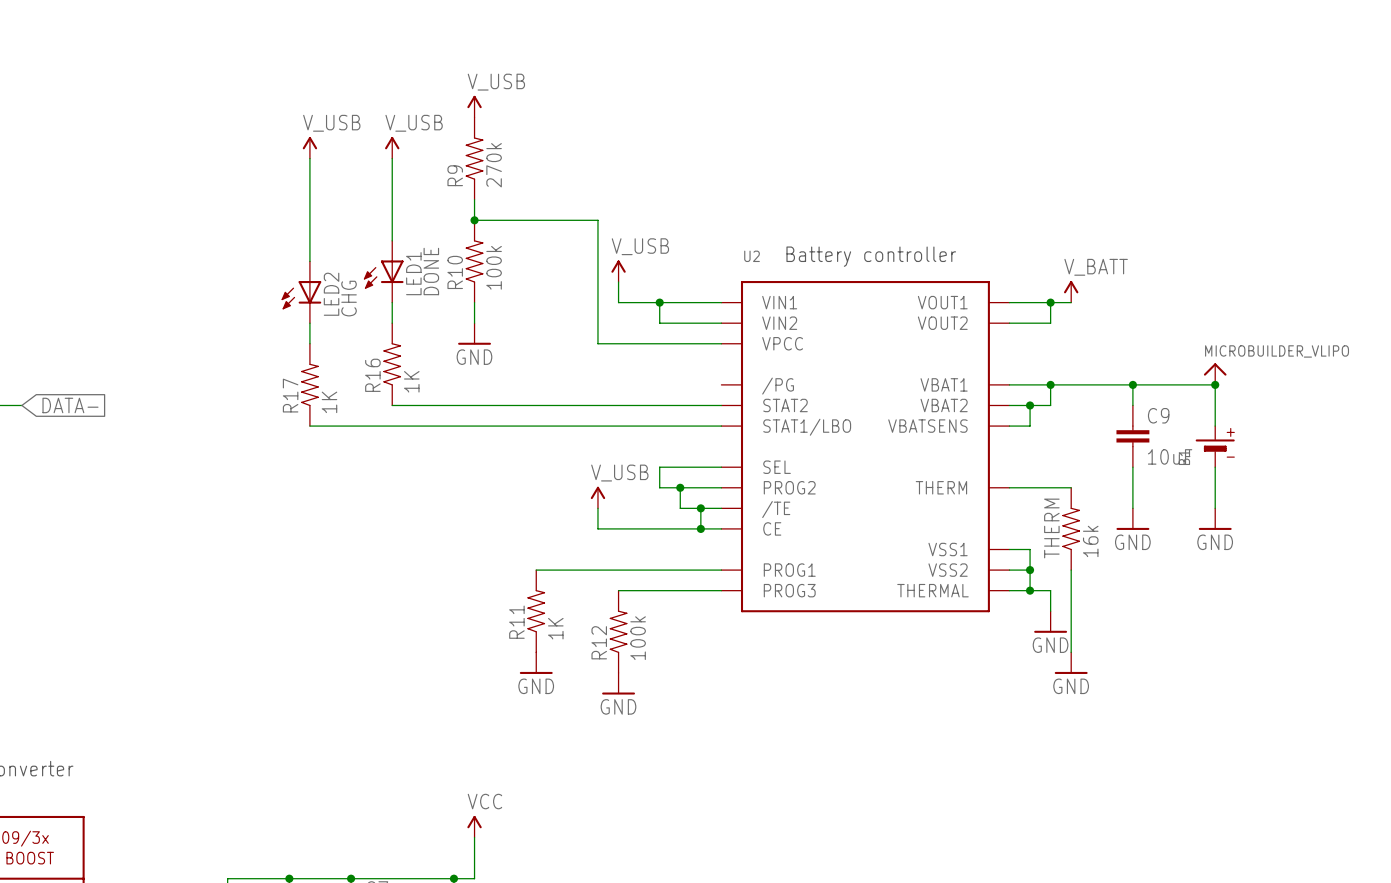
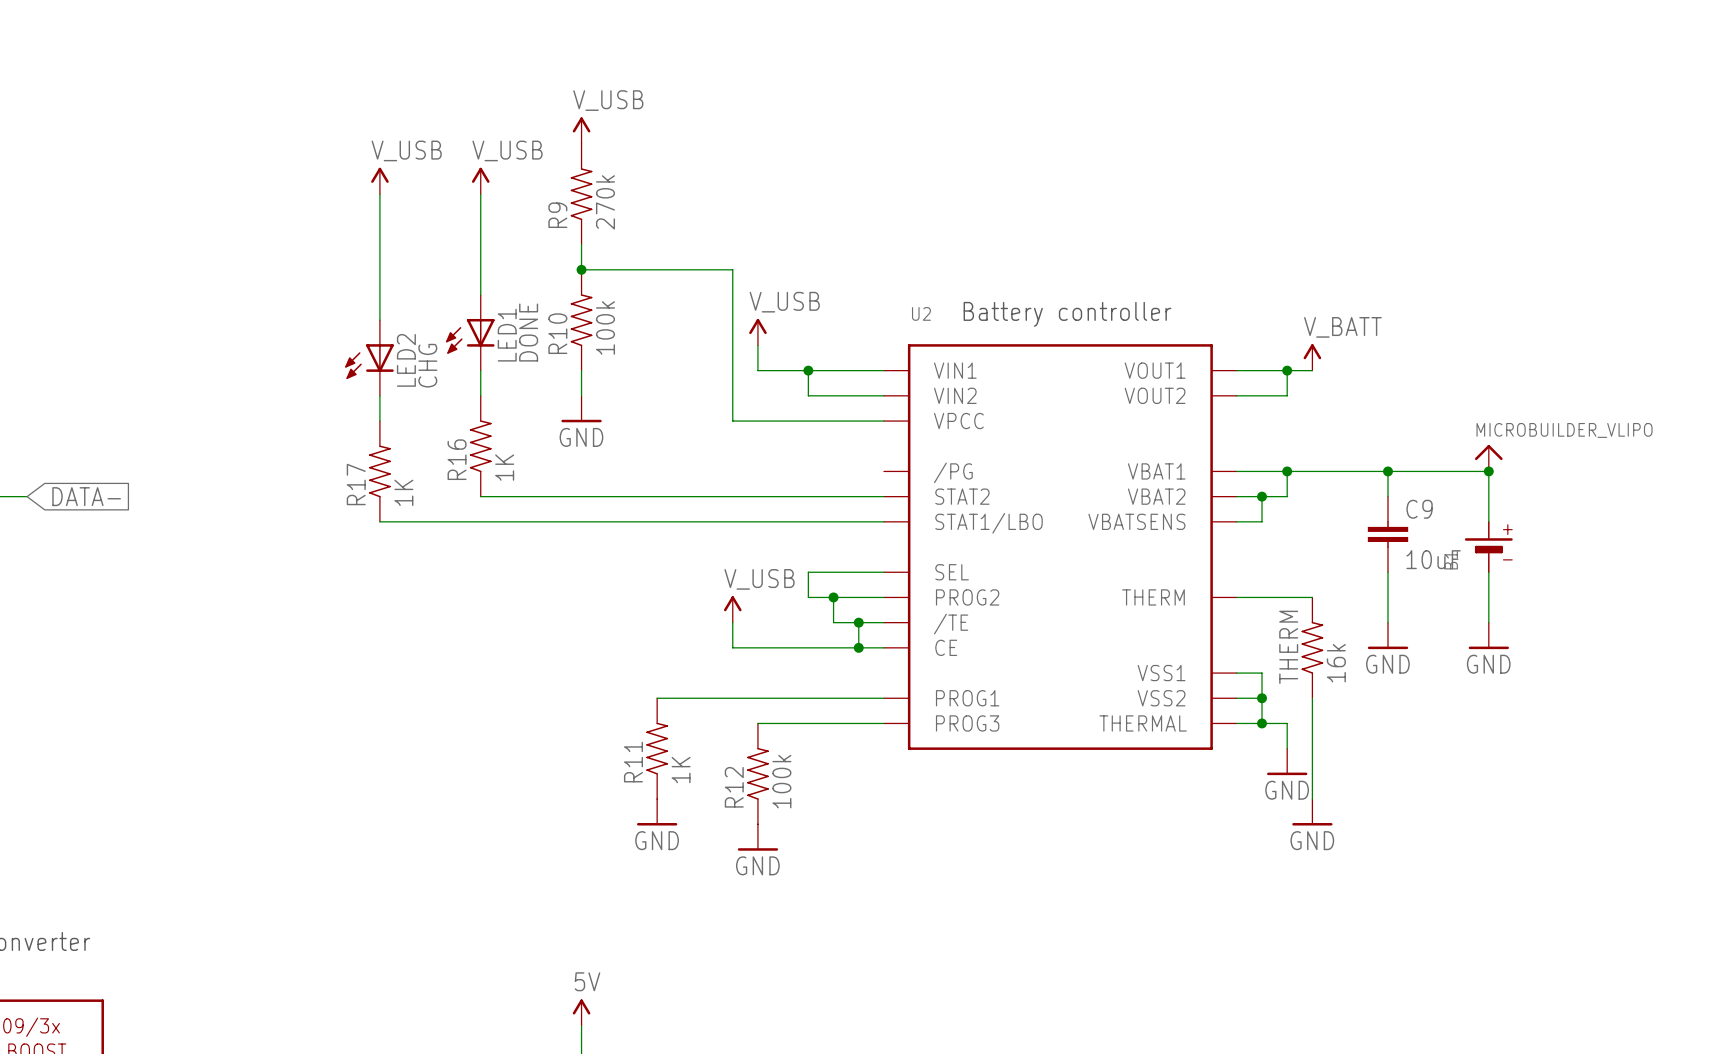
power symbol: VCC (474, 826) -> 5V (581, 1012)

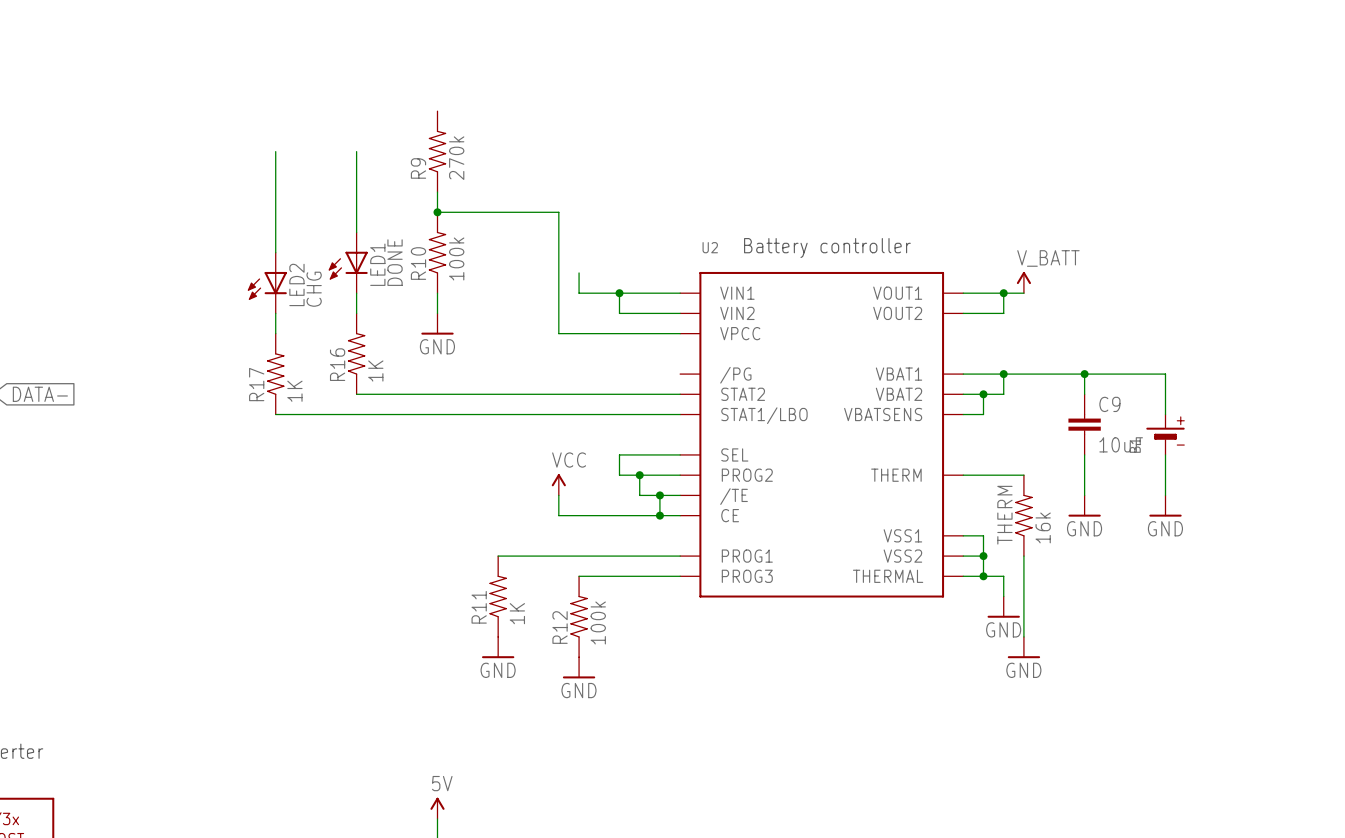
power symbol: V_USB (581, 130) -> none
power symbol: V_USB (379, 180) -> none
power symbol: V_USB (480, 180) -> none
power symbol: V_USB (757, 332) -> none
power symbol: MICROBUILDER_VLIPO (1488, 458) -> none
junction: (1488, 471) -> none
power symbol: V_USB (732, 609) -> VCC (558, 484)

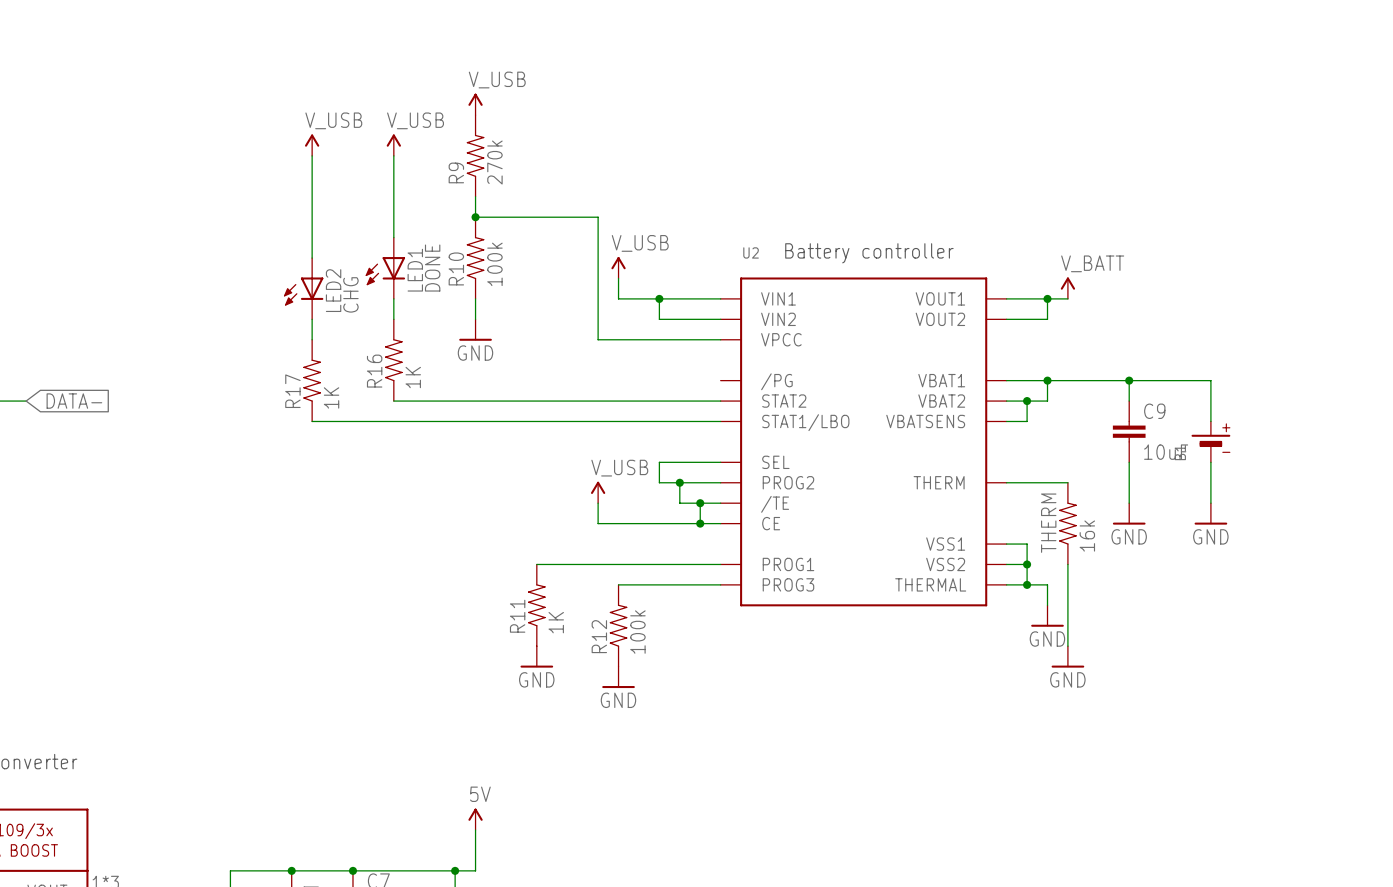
power symbol: none -> V_USB (475, 104)
power symbol: none -> V_USB (312, 145)
power symbol: none -> V_USB (393, 145)
power symbol: none -> V_USB (618, 267)
power symbol: VCC (558, 484) -> V_USB (598, 492)

